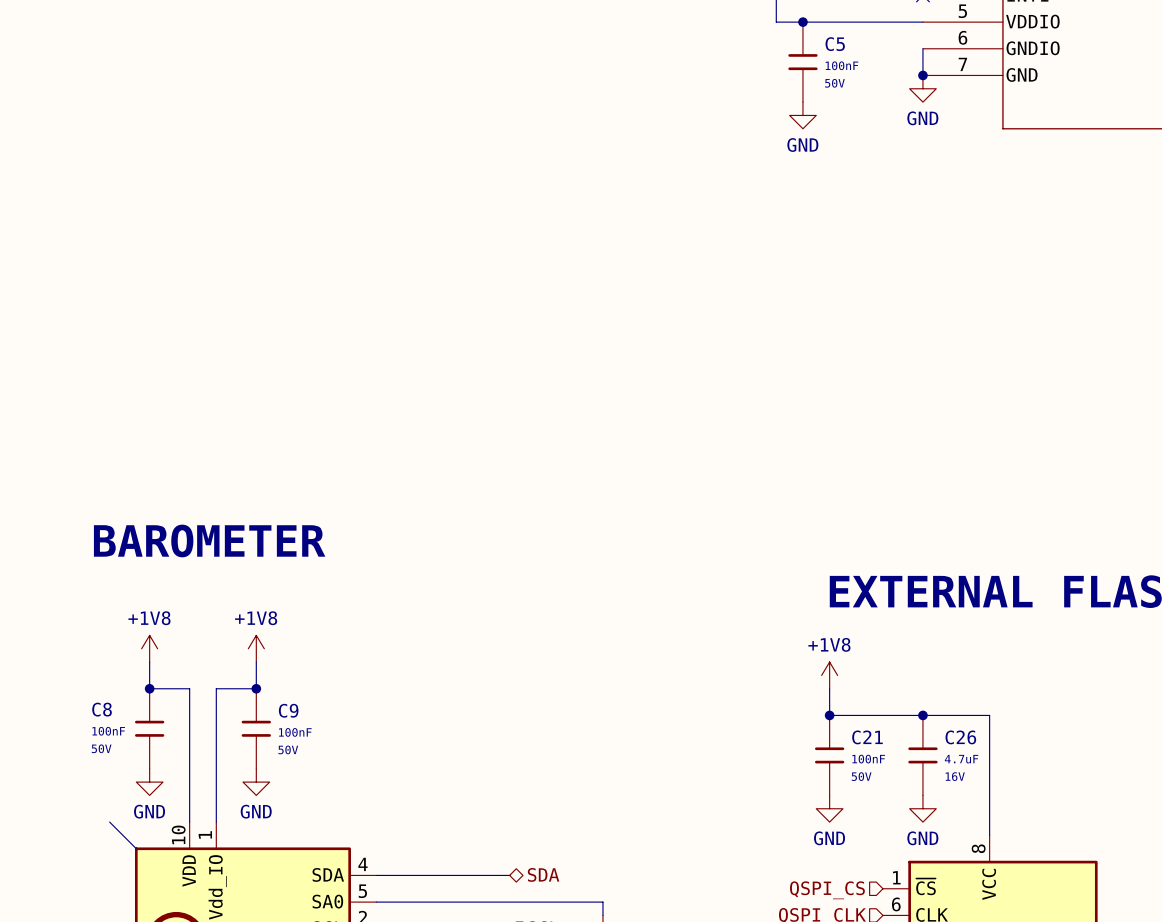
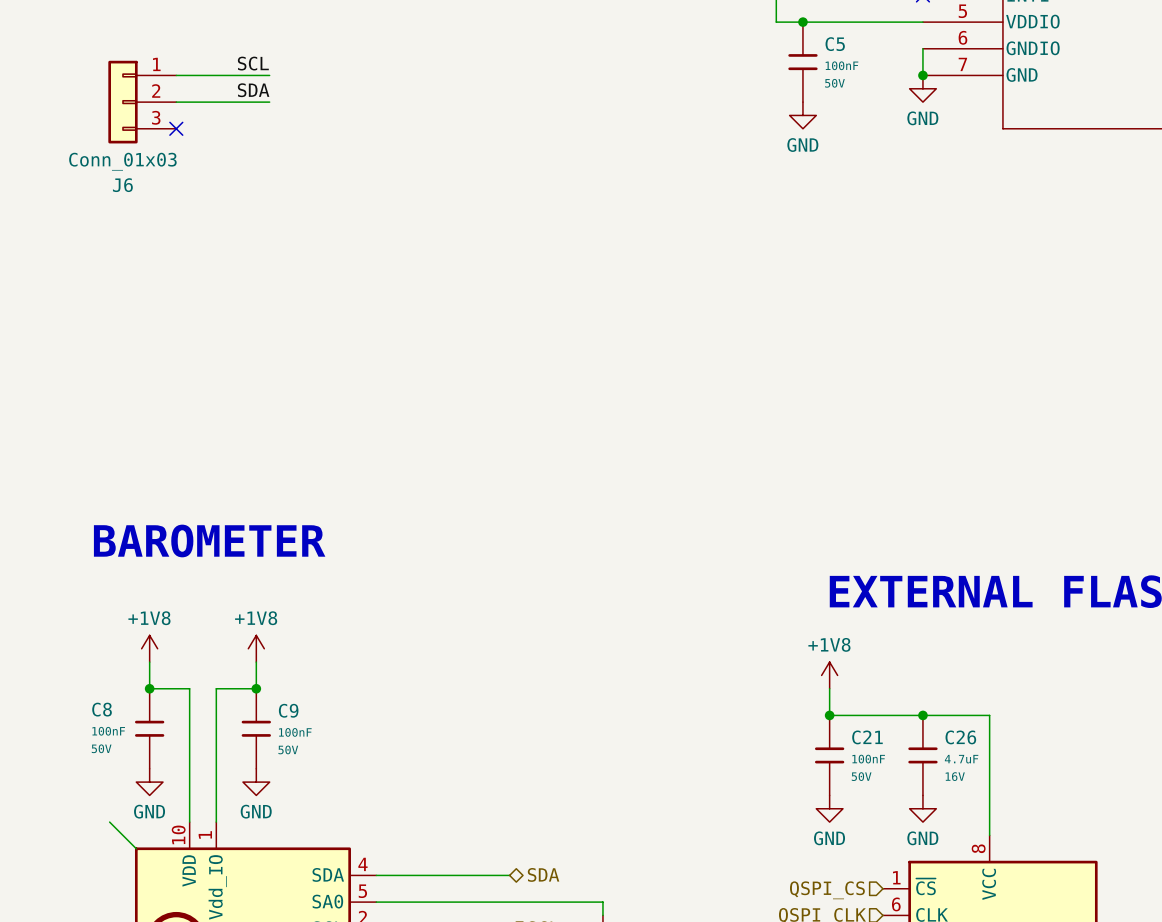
label: none -> SCL (253, 63)
wire: none -> (176, 75) (269, 75)
label: none -> SDA (253, 90)
J6: none -> Conn_01x03 (142, 102)
wire: none -> (176, 102) (269, 102)
no-connect mark: none -> (176, 128)

